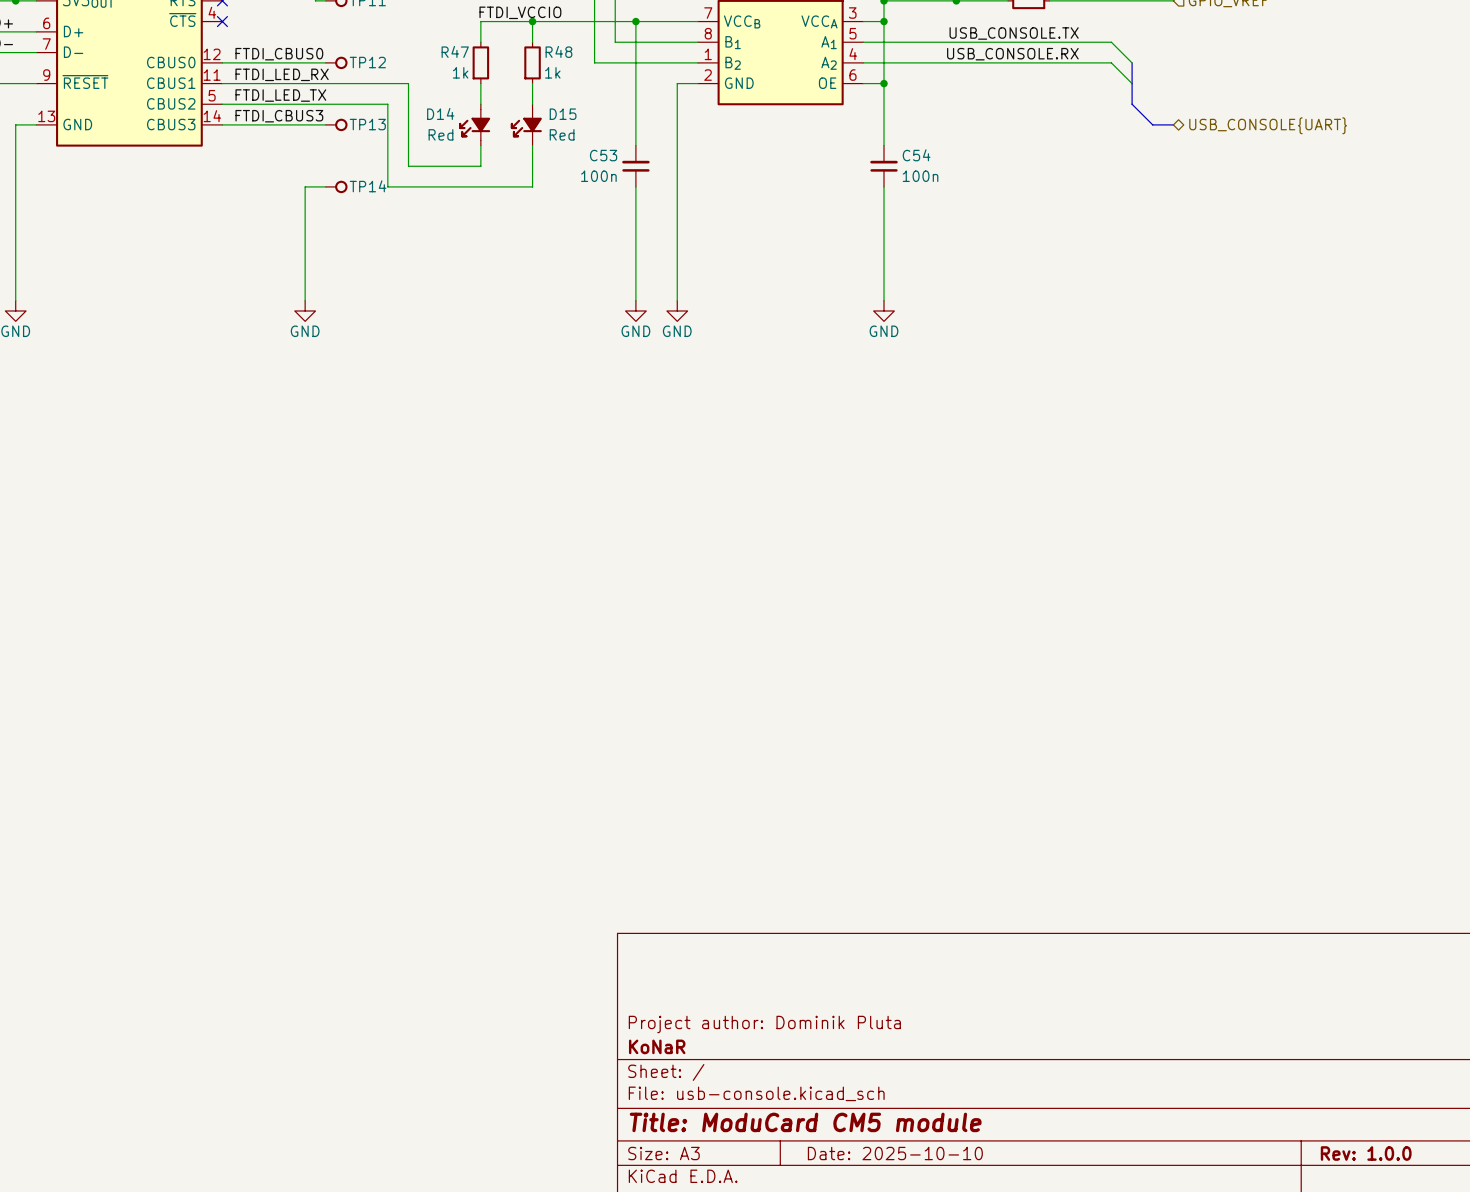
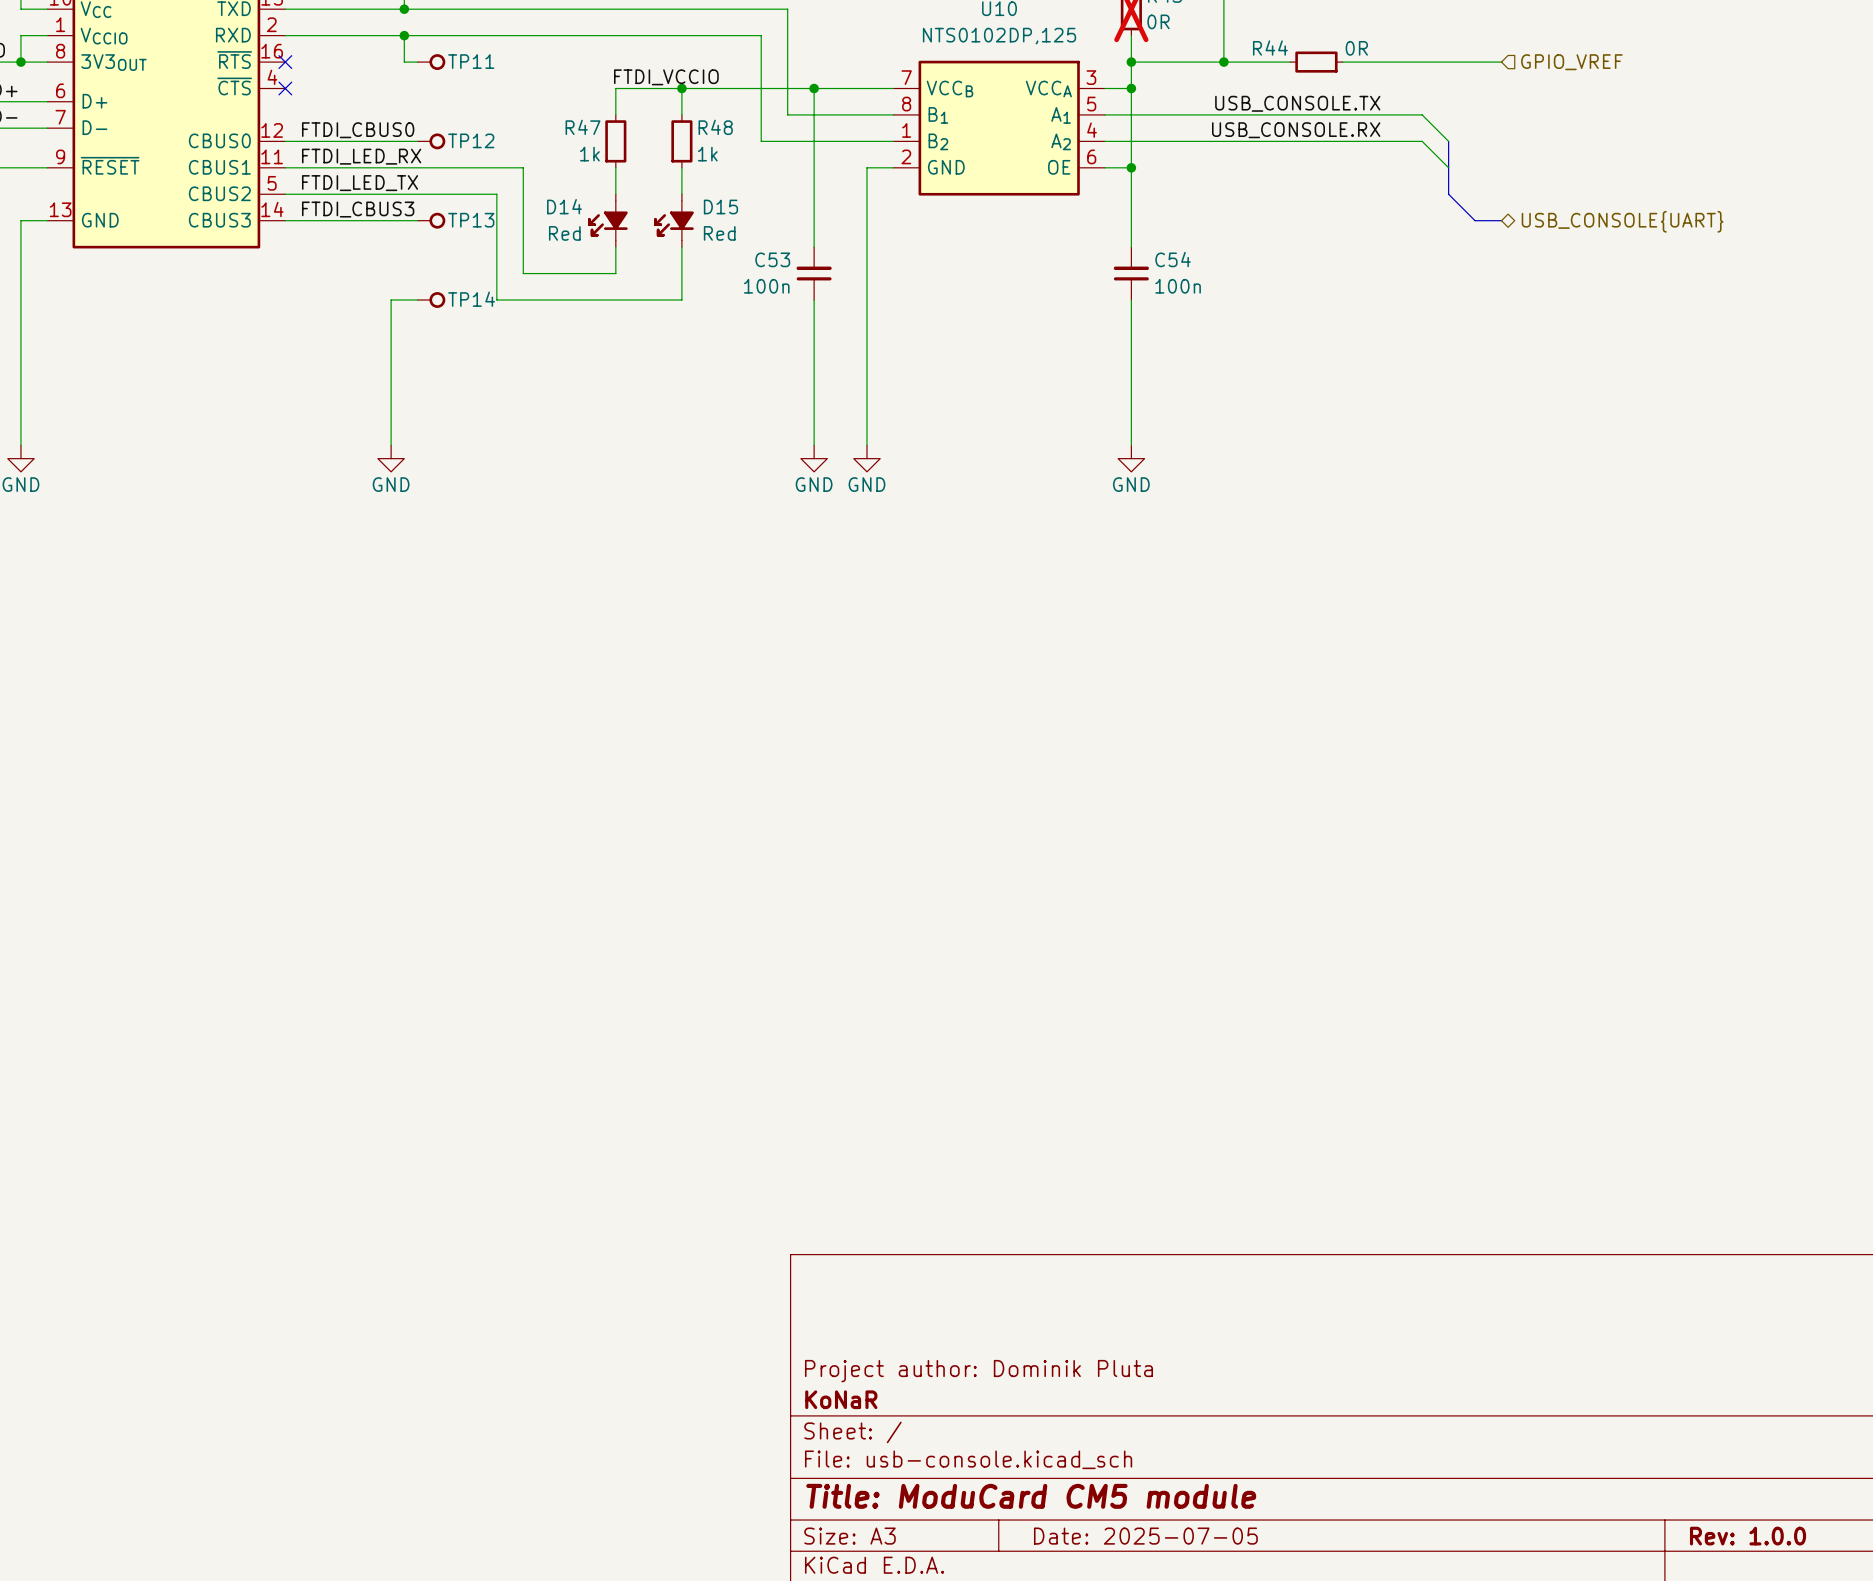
title block: Date: 2025-10-10 (895, 1153) -> Date: 2025-07-05 (1145, 1536)

